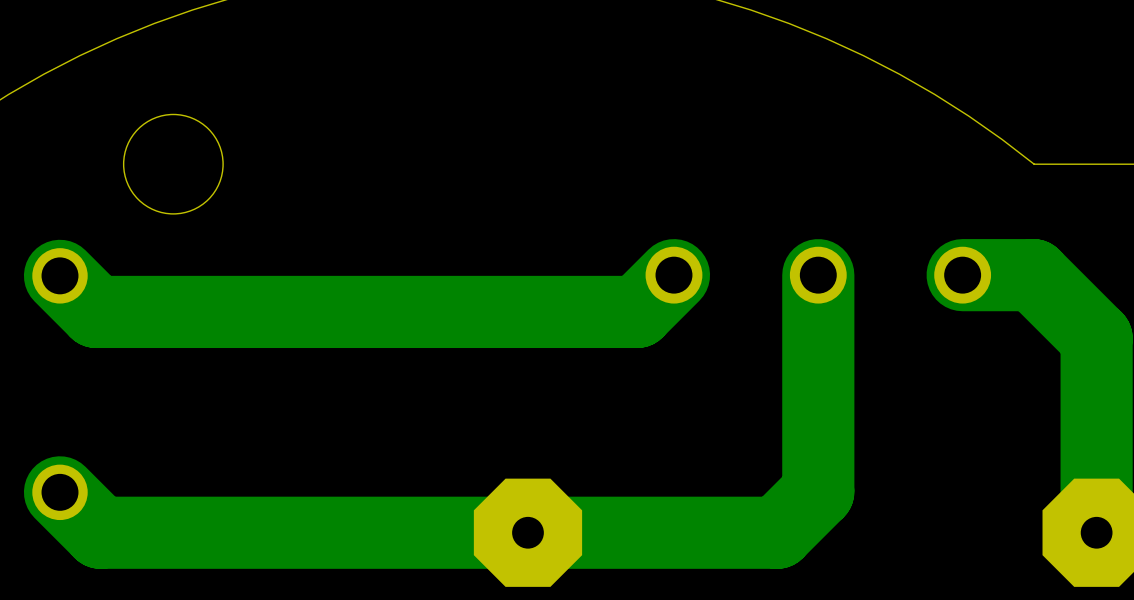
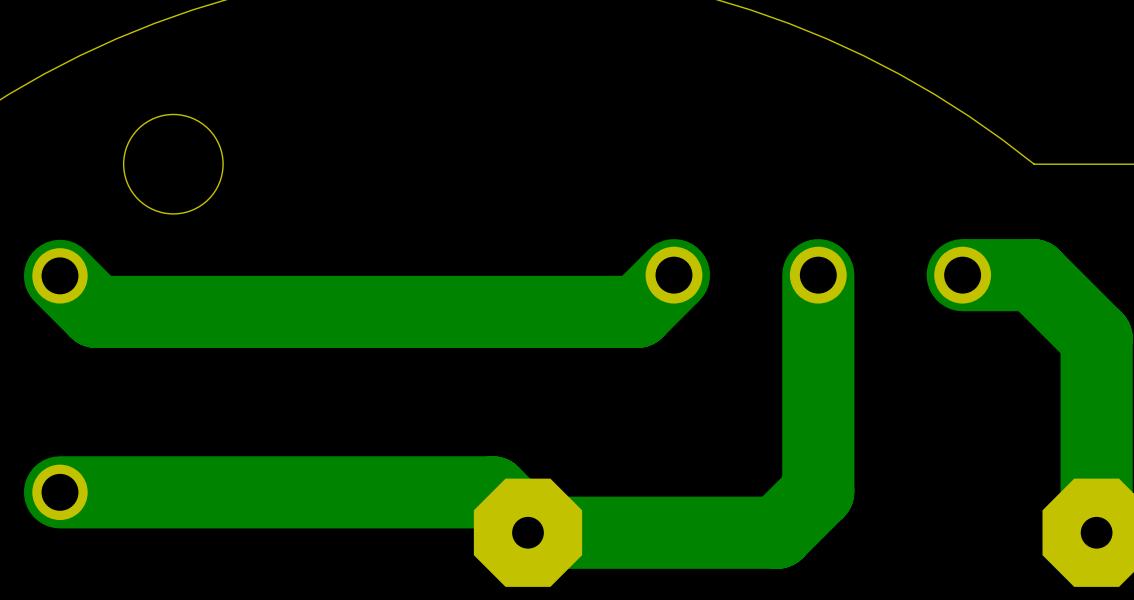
track: (60, 492) (100, 532) (527, 532) -> (60, 492) (492, 492) (527, 527) (527, 532)

